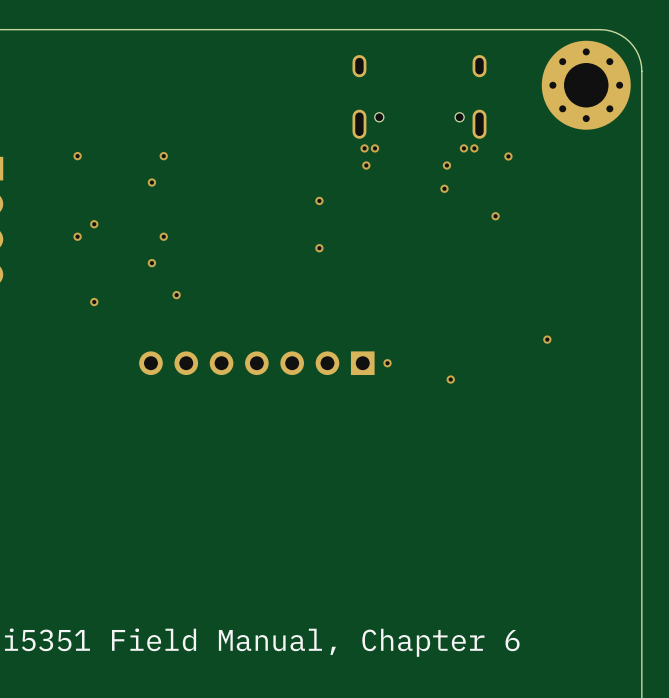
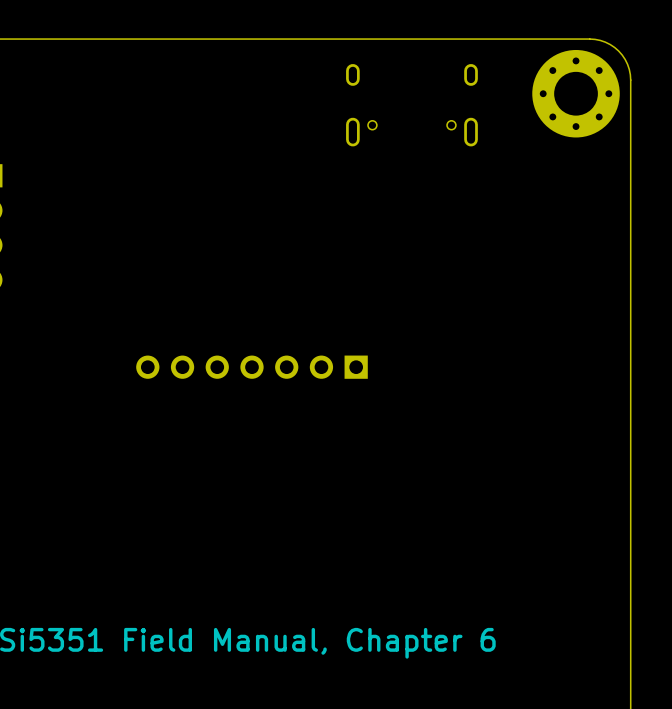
via: (364, 148) -> none
via: (375, 148) -> none
via: (463, 148) -> none
via: (474, 148) -> none
via: (77, 156) -> none
via: (163, 156) -> none
via: (508, 156) -> none
via: (366, 165) -> none
via: (446, 165) -> none
via: (151, 182) -> none
via: (444, 188) -> none
via: (319, 200) -> none
via: (495, 216) -> none
via: (94, 224) -> none
via: (77, 236) -> none
via: (163, 236) -> none
via: (319, 248) -> none
via: (151, 263) -> none
via: (176, 295) -> none
via: (94, 302) -> none
via: (547, 339) -> none
via: (387, 363) -> none
via: (450, 379) -> none

